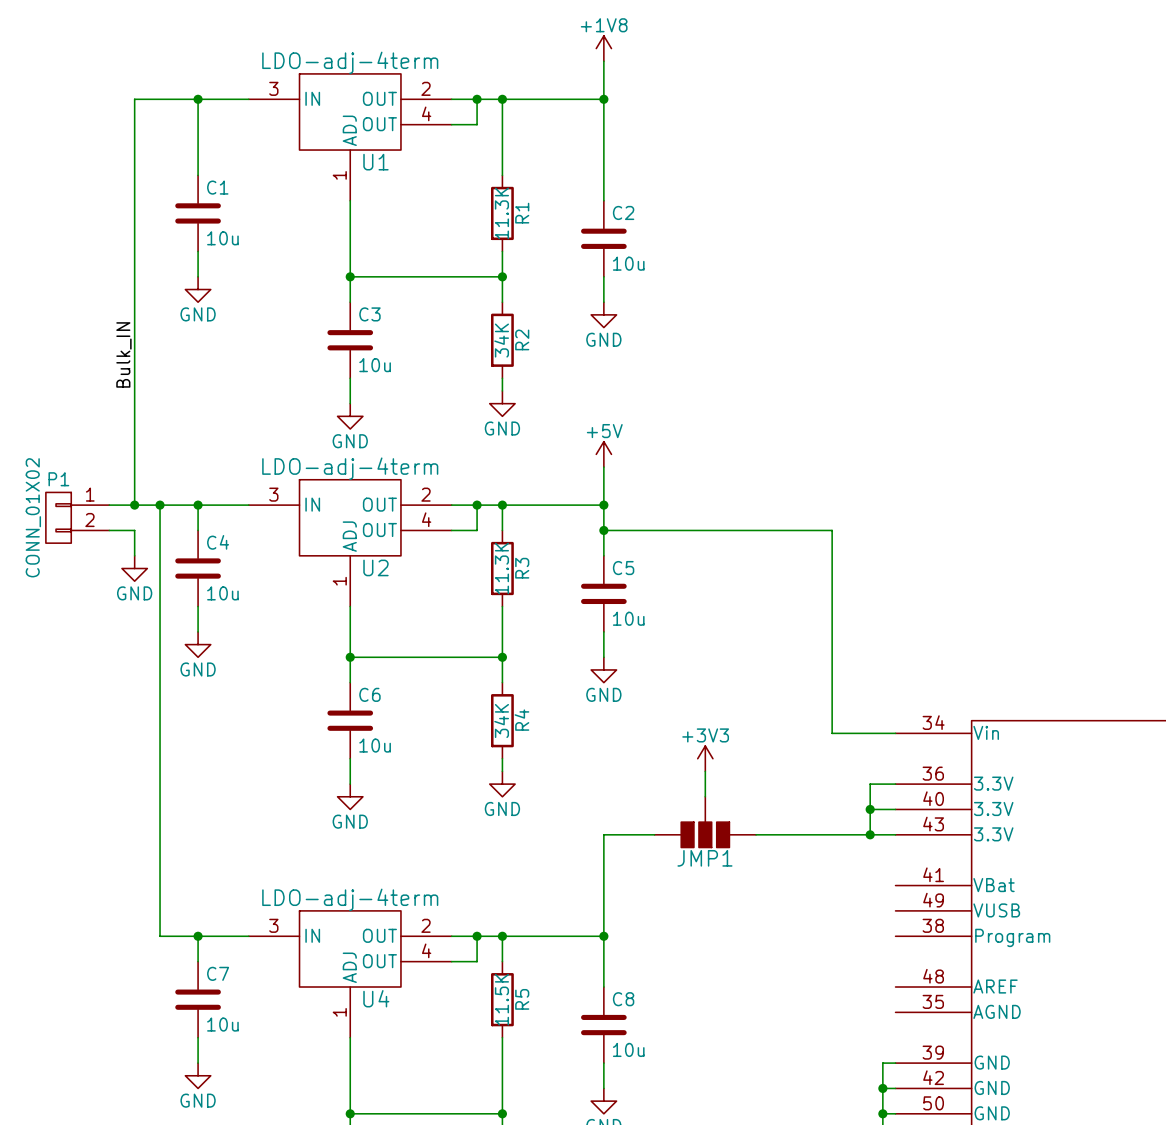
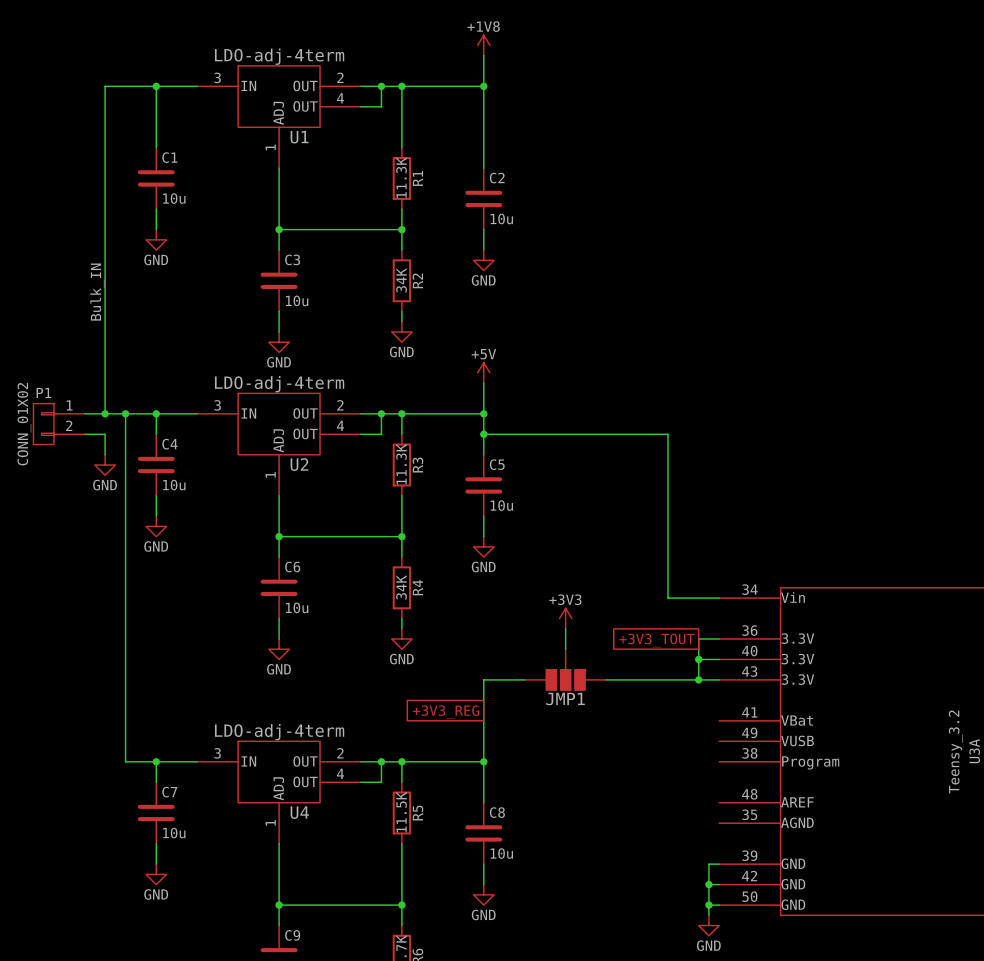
global label: none -> +3V3_TOUT (656, 640)
global label: none -> +3V3_REG (446, 712)

